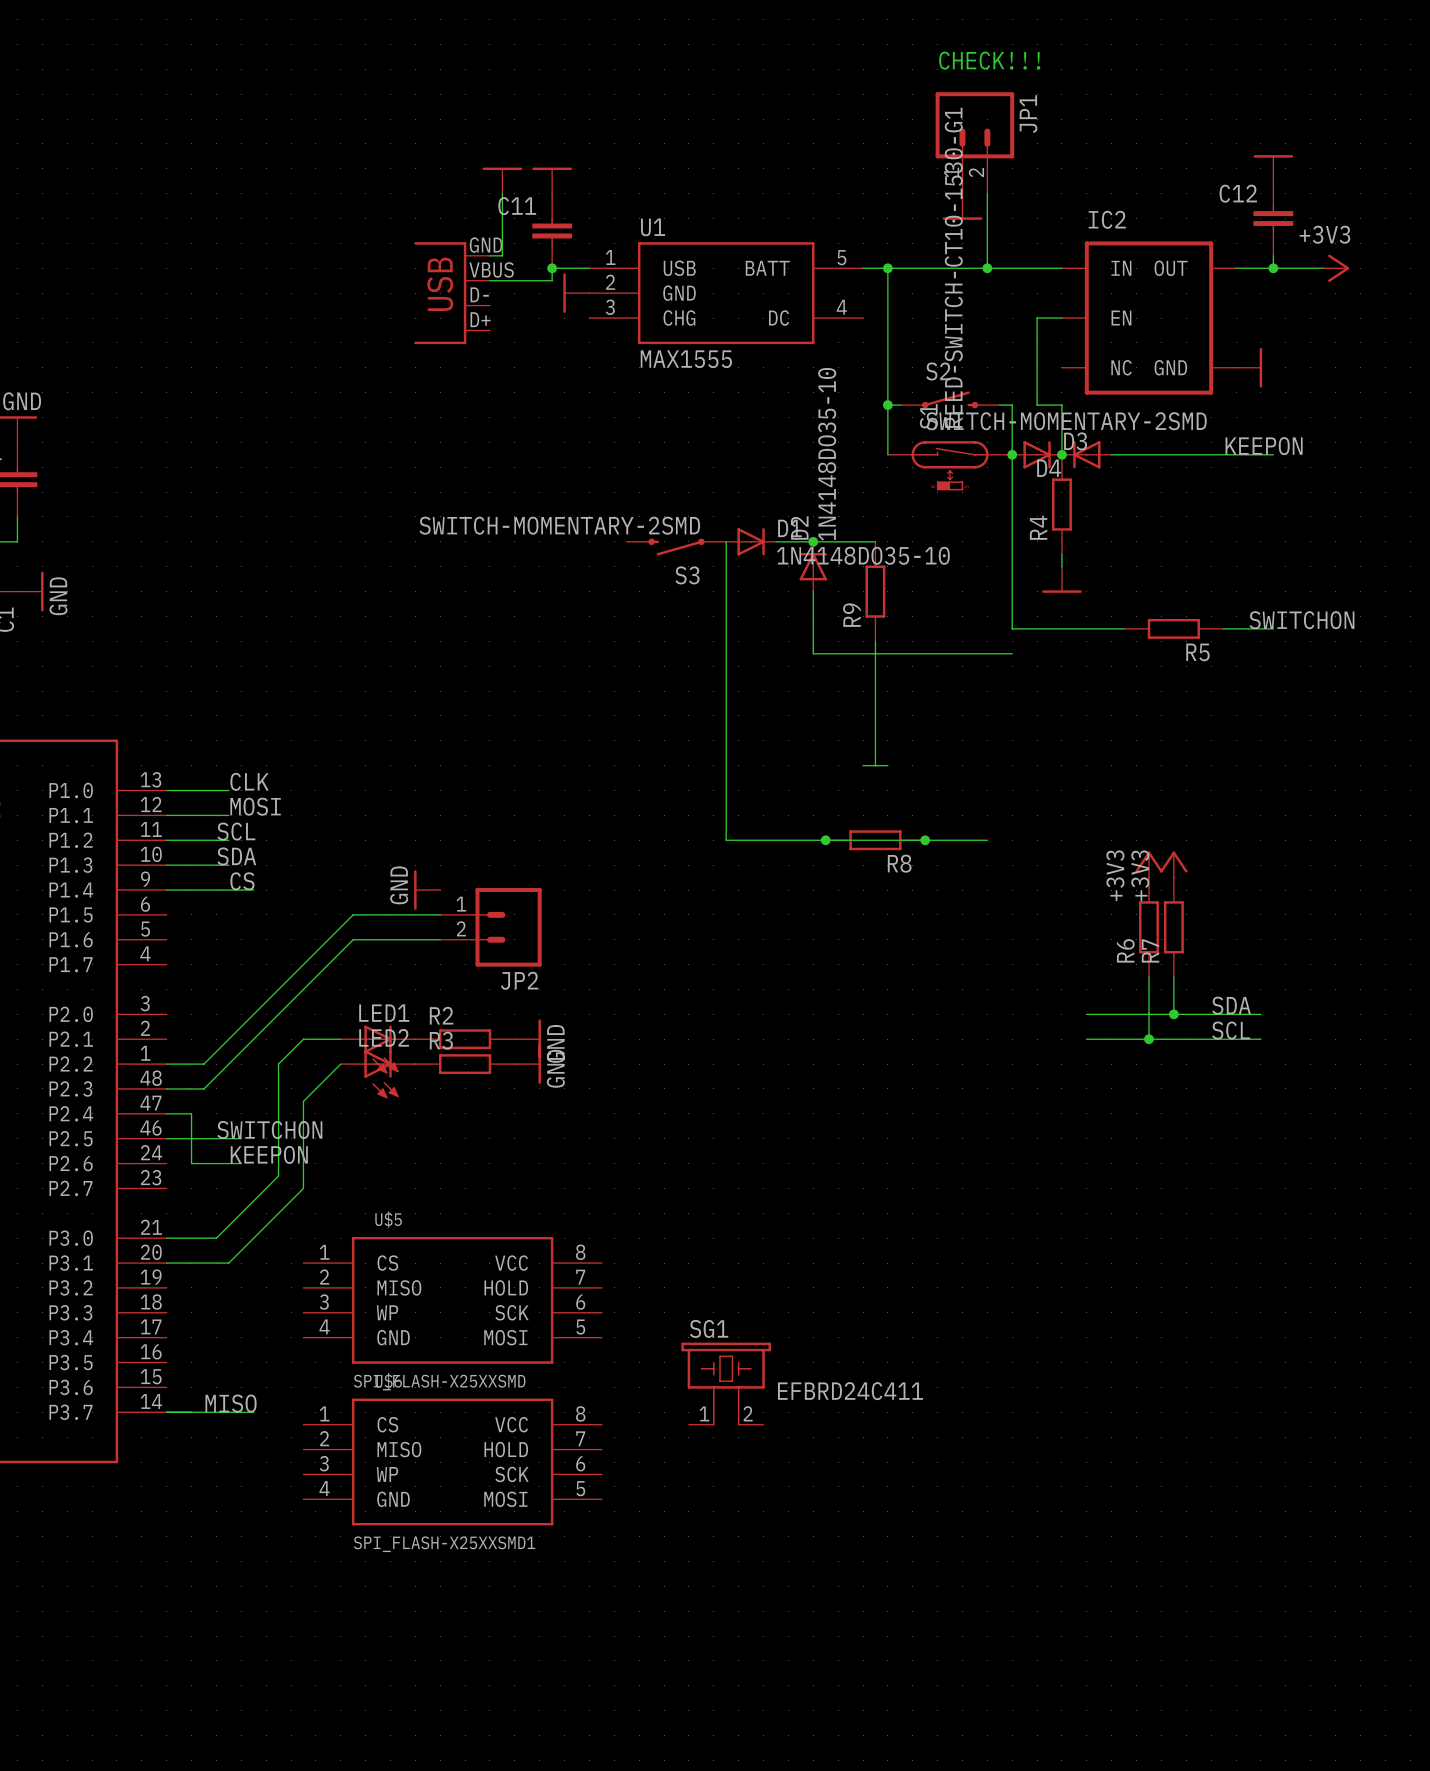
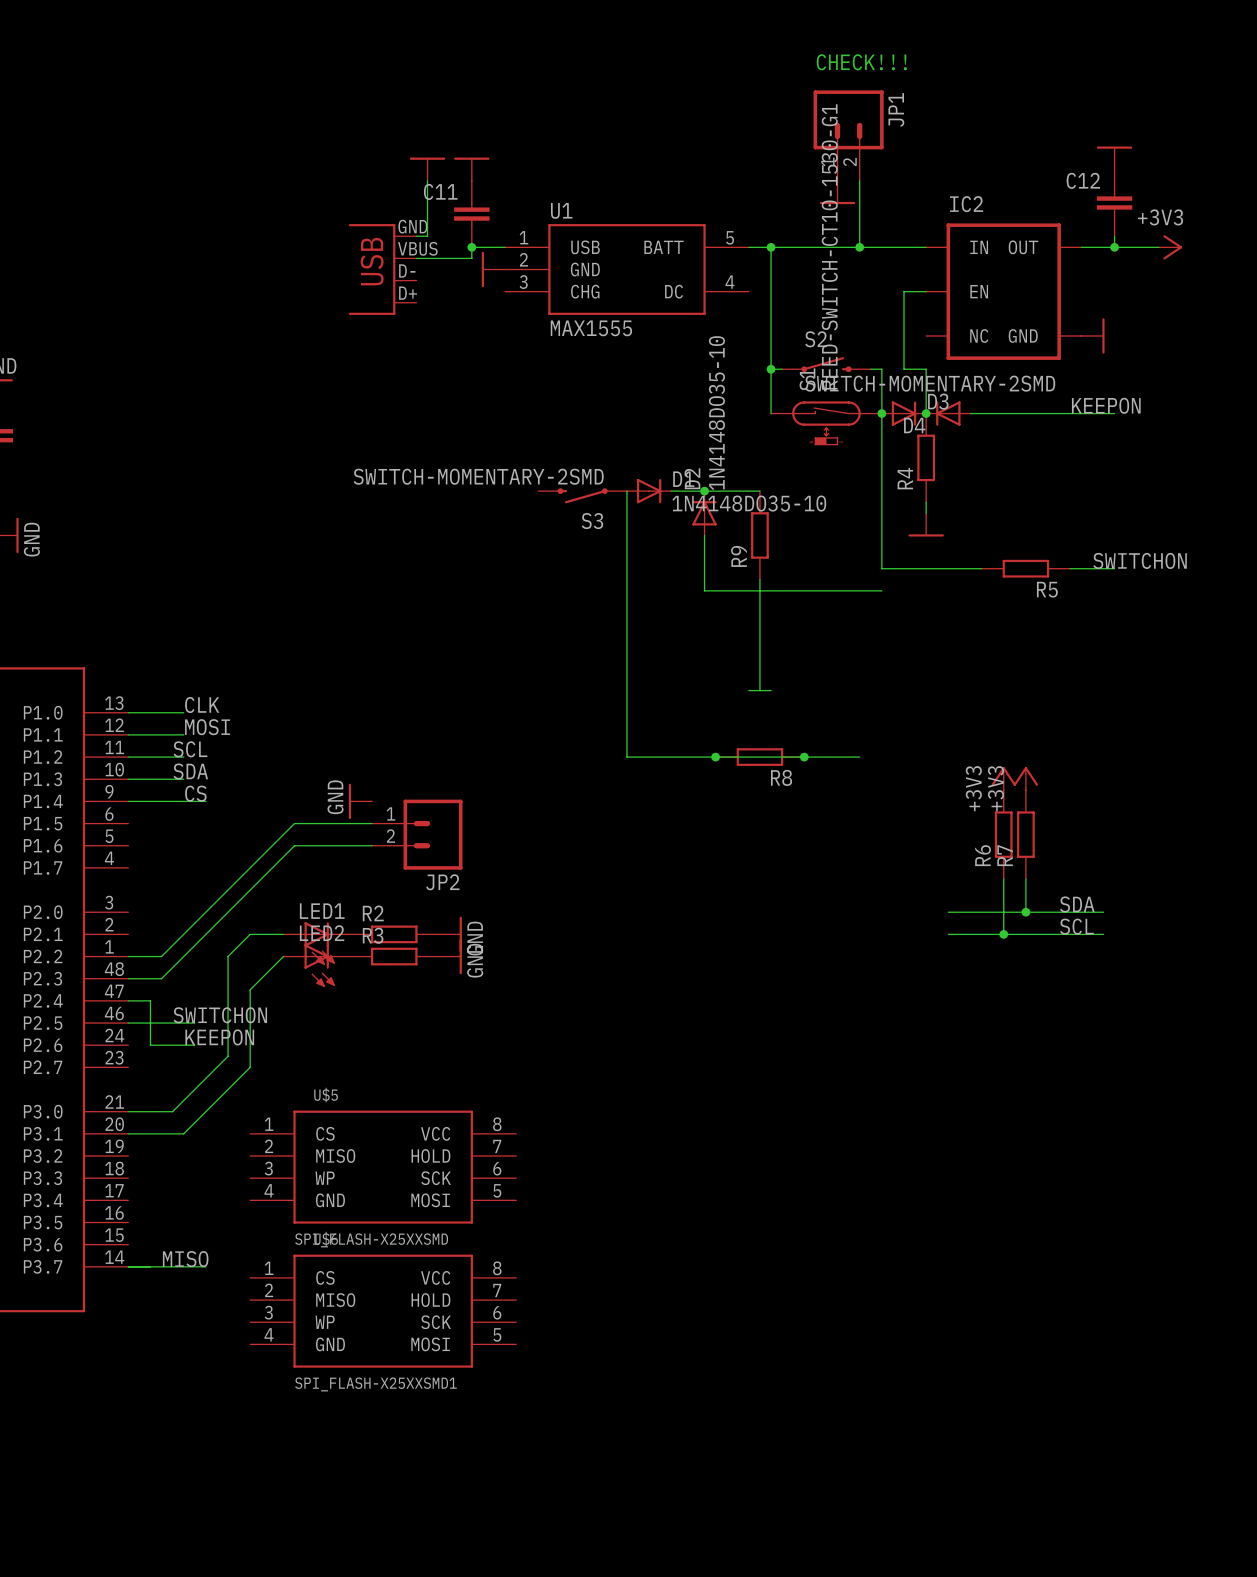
SG1: EFBRD24C411 (726, 1384) -> none

